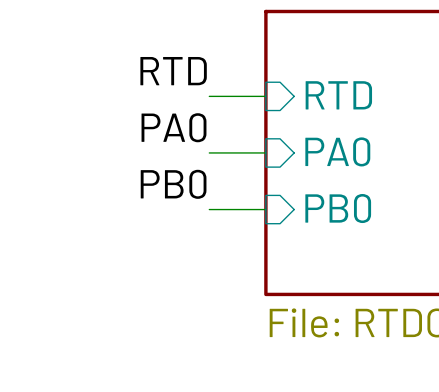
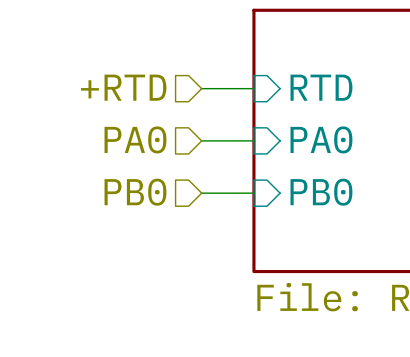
label: RTD (173, 71) -> none
hierarchical label: none -> +RTD (123, 87)
label: PA0 (173, 127) -> none
hierarchical label: none -> PA0 (135, 139)
label: PB0 (173, 184) -> none
hierarchical label: none -> PB0 (135, 192)

